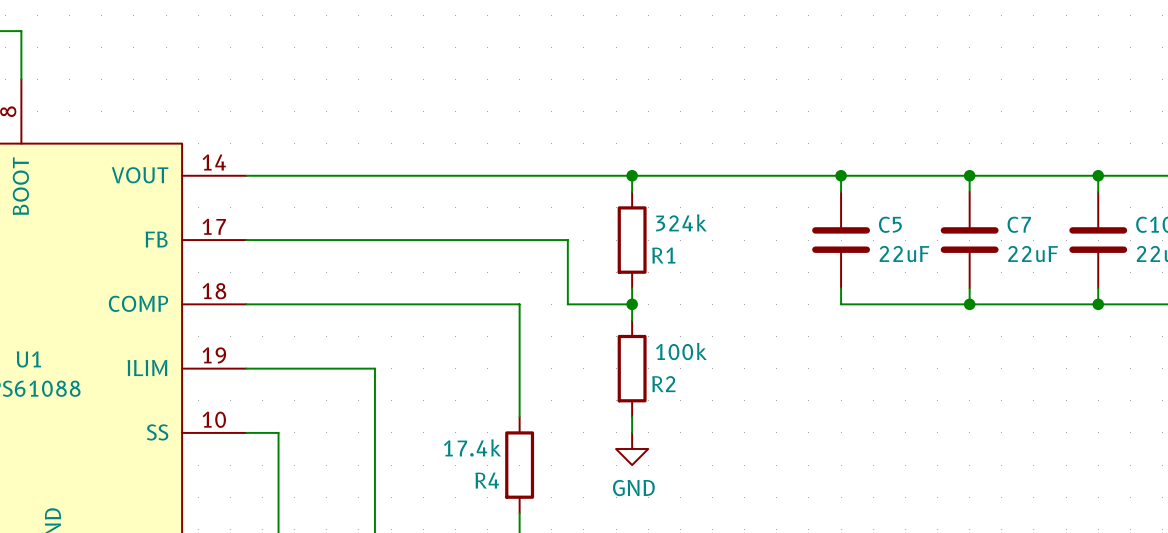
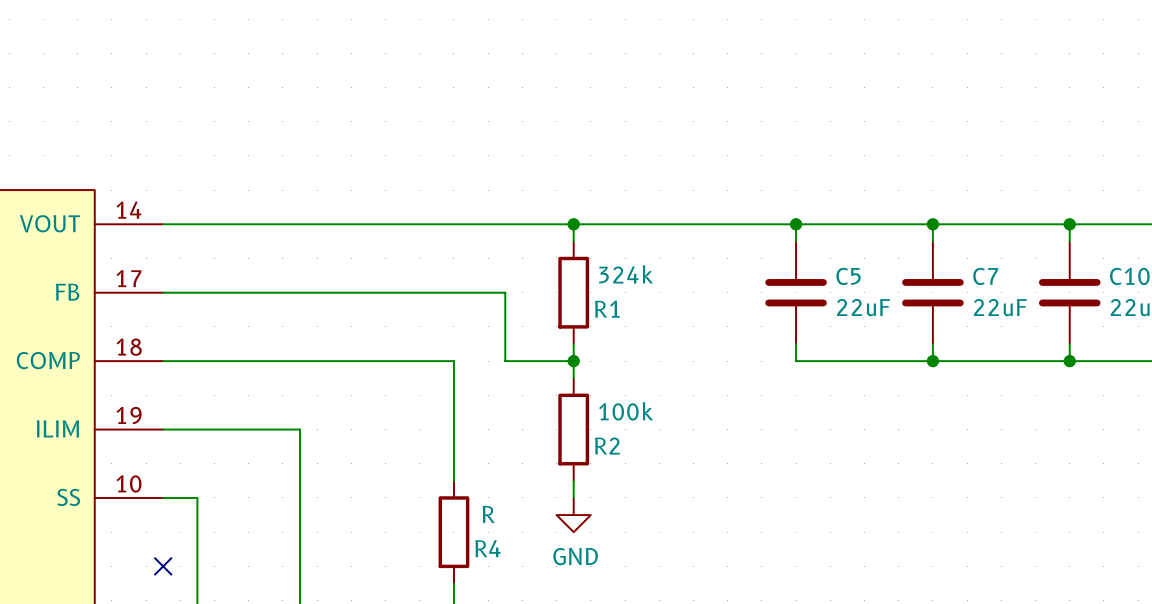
R4 value: 17.4k (472, 447) -> R (488, 514)
R4 name position: R4 (487, 480) -> R4 (487, 548)
no-connect mark: none -> (163, 566)

